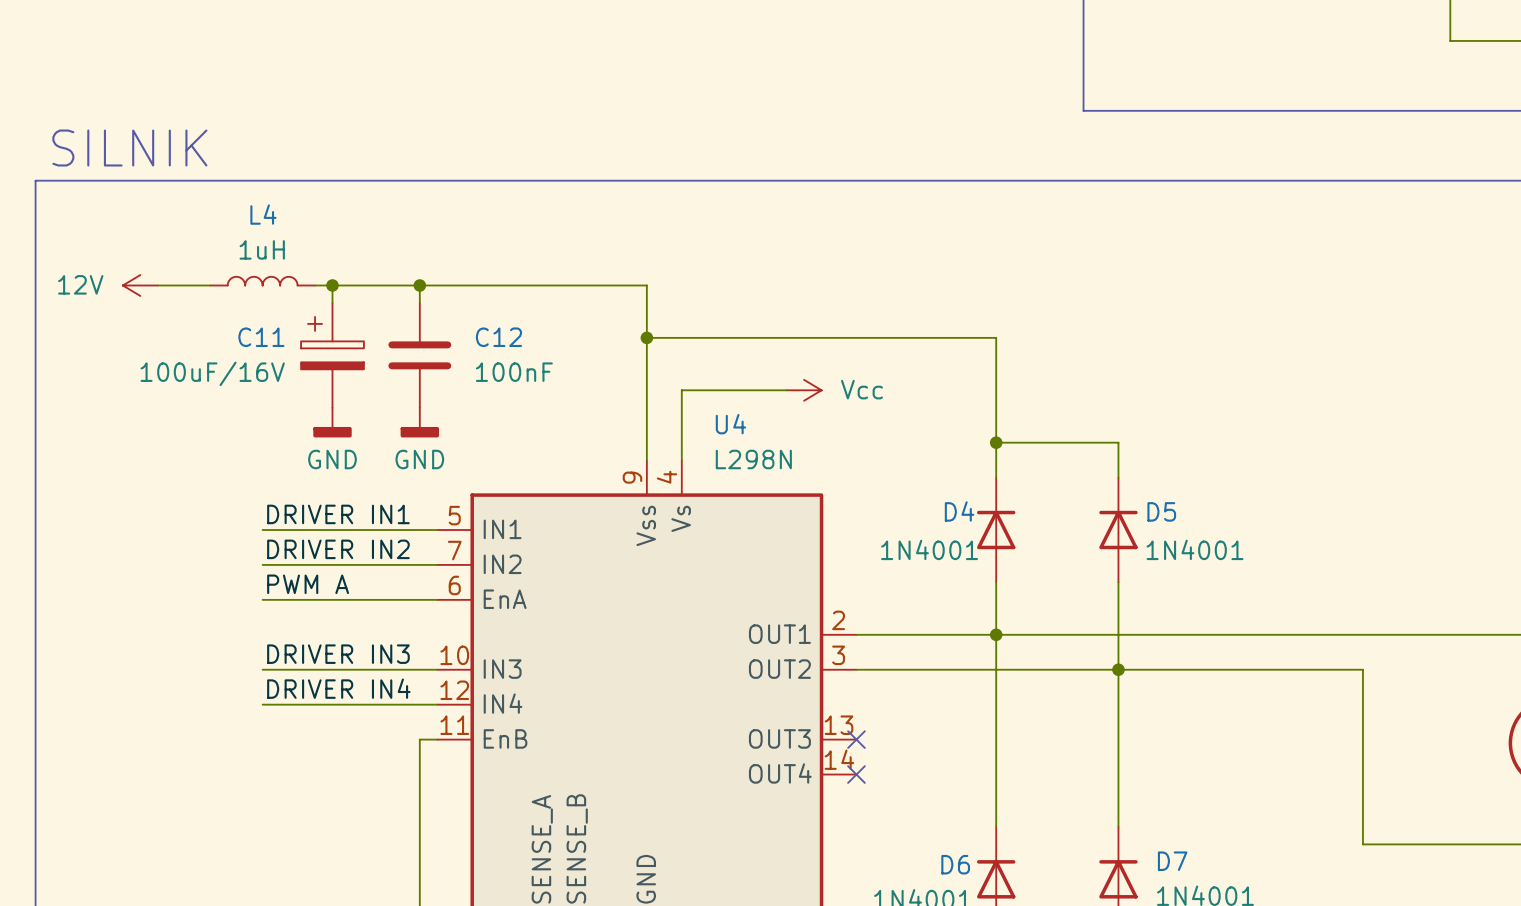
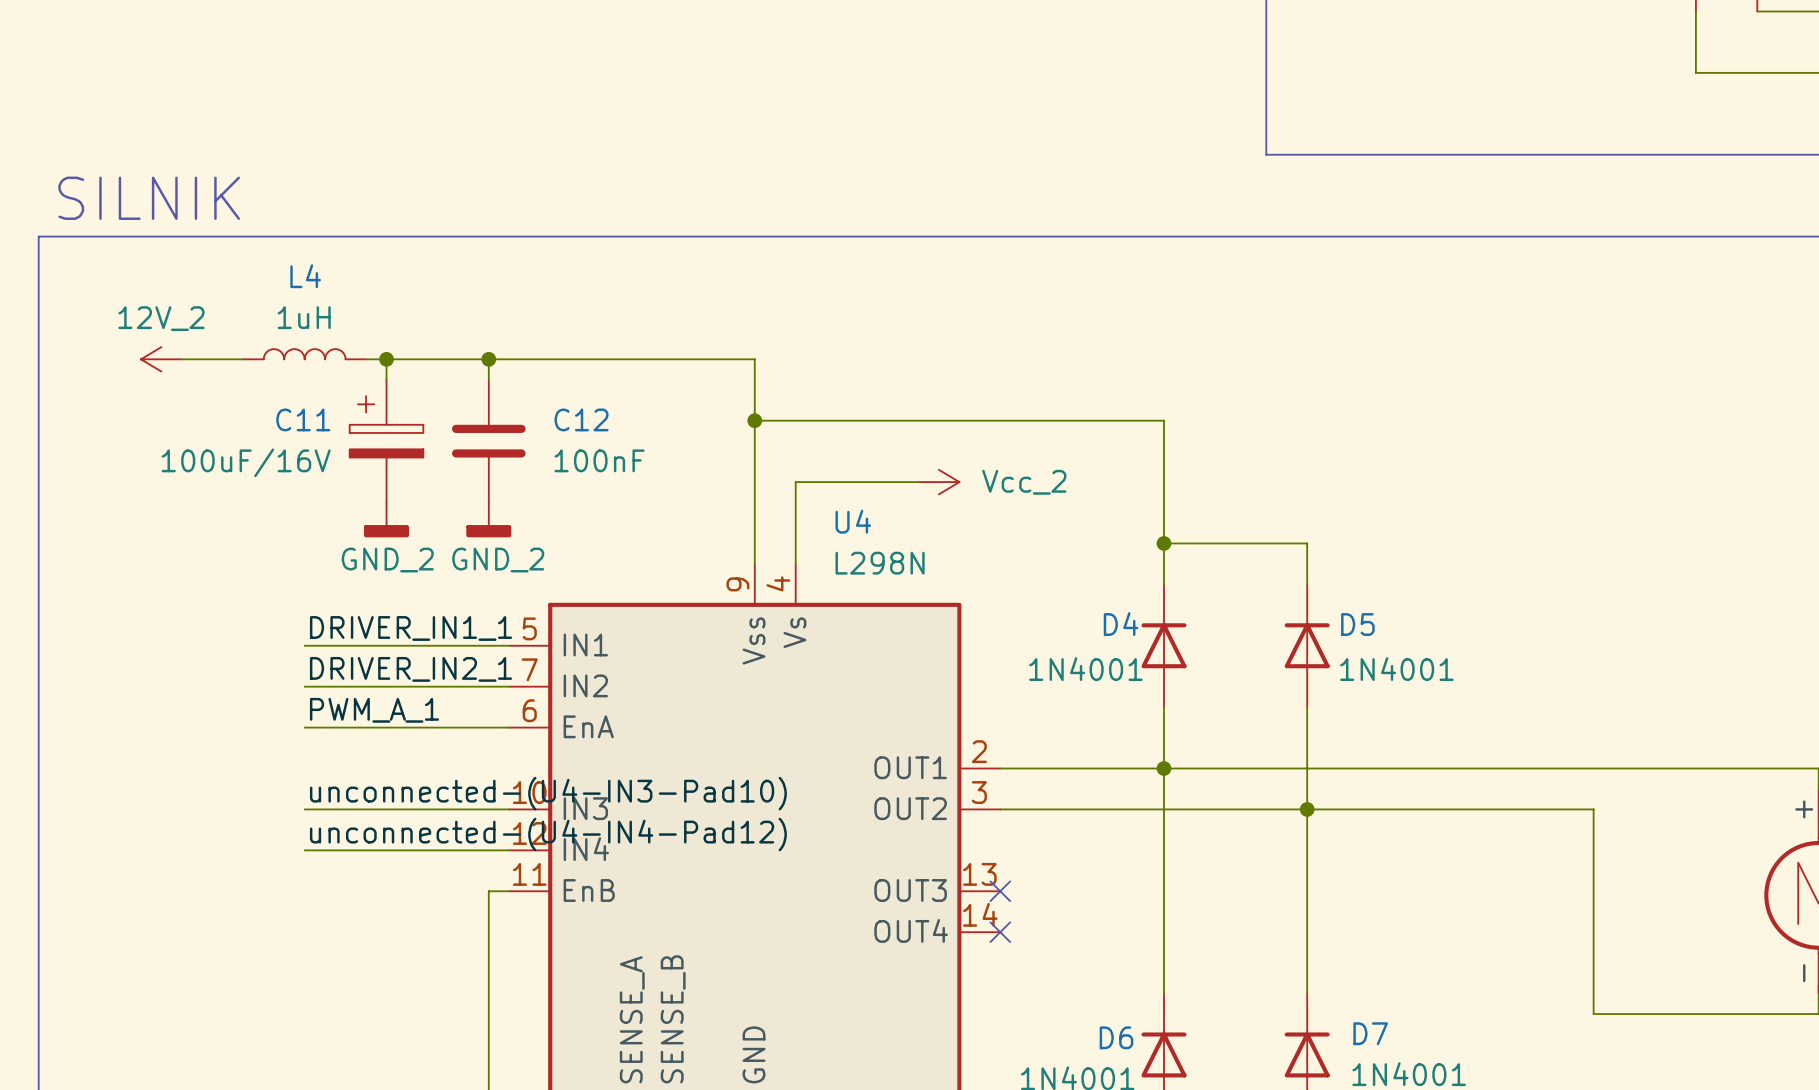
power symbol: 12V (140, 285) -> 12V_2 (161, 359)
power symbol: Vcc (804, 390) -> Vcc_2 (938, 482)
power symbol: GND (332, 422) -> GND_2 (386, 519)
power symbol: GND (419, 422) -> GND_2 (488, 519)
label: DRIVER IN1 (338, 514) -> DRIVER_IN1_1 (411, 628)
label: DRIVER IN2 (338, 549) -> DRIVER_IN2_1 (411, 669)
label: PWM A (308, 584) -> PWM_A_1 (374, 710)
label: DRIVER IN3 (338, 654) -> unconnected-(U4-IN3-Pad10) (548, 793)
label: DRIVER IN4 (338, 688) -> unconnected-(U4-IN4-Pad12) (548, 834)

